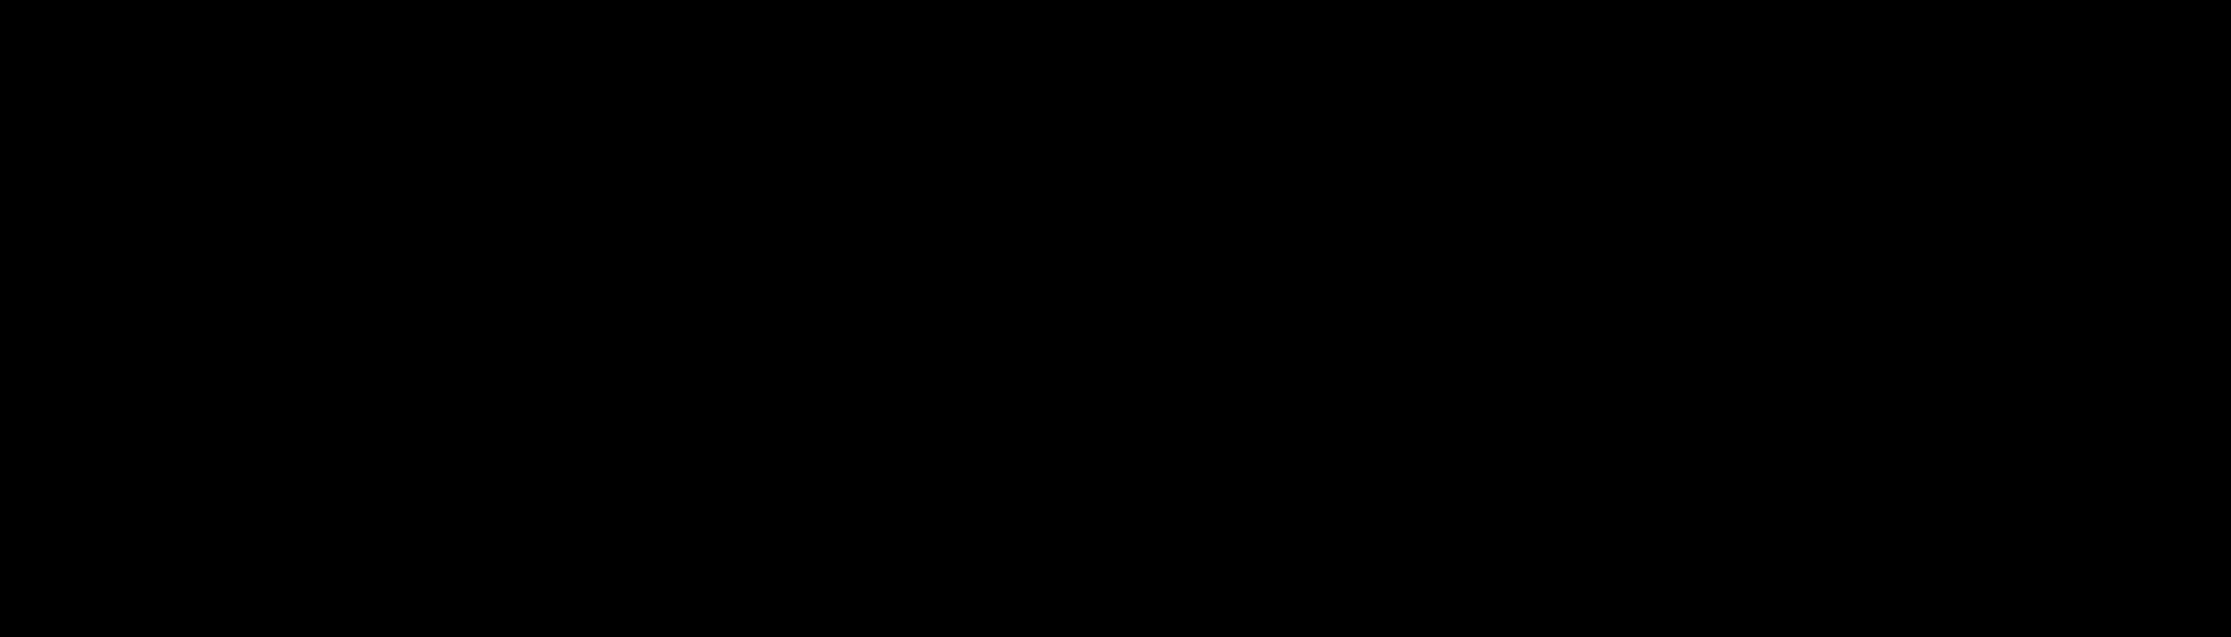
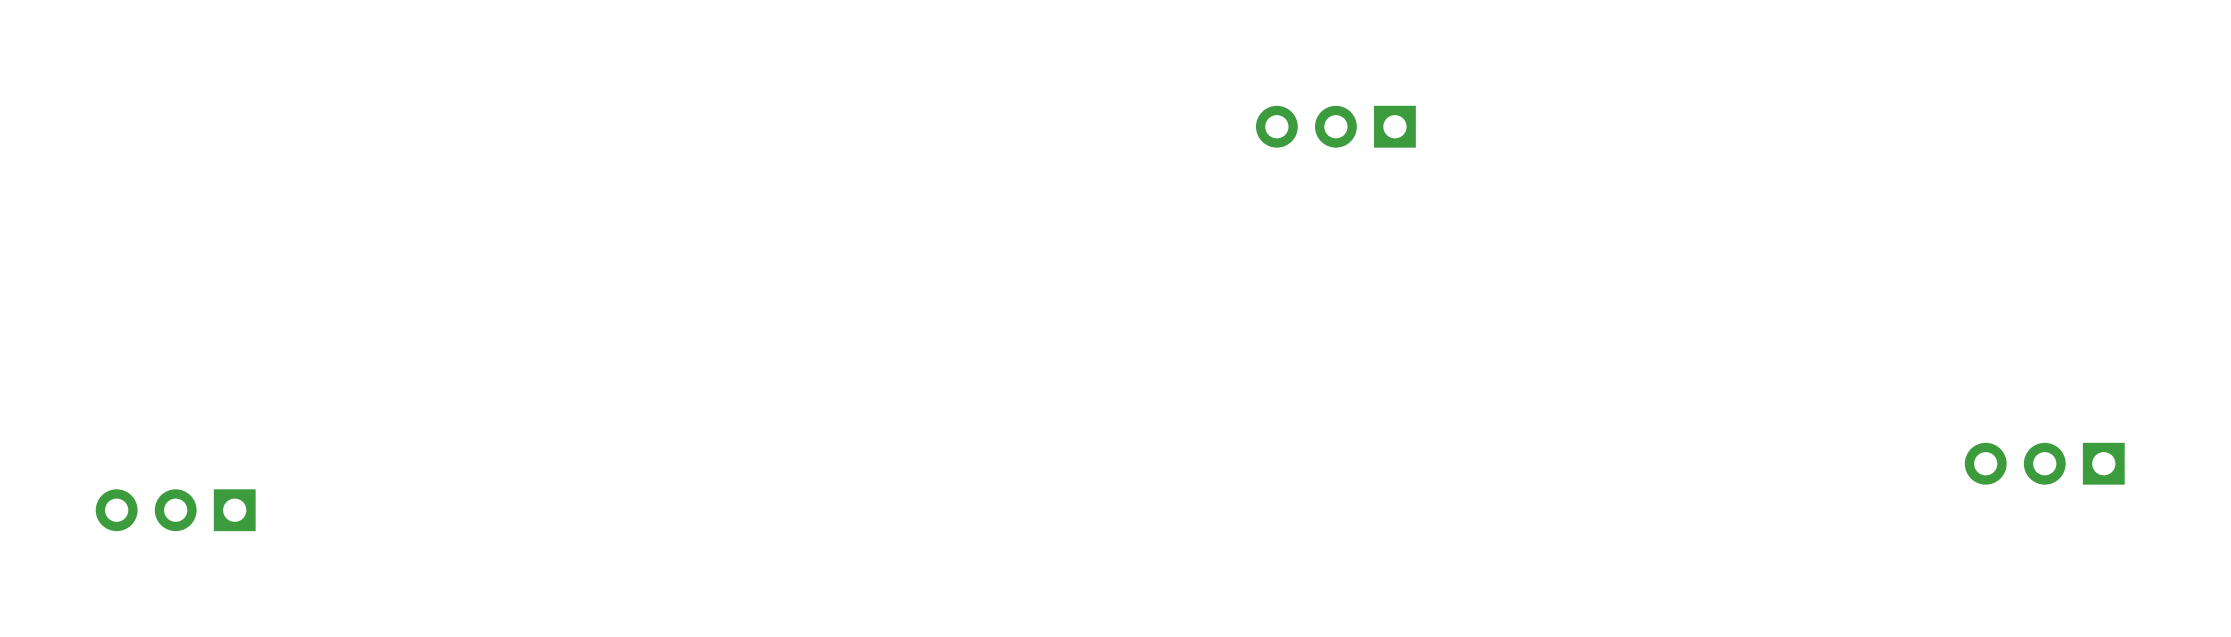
part: none -> (1335, 126)
part: none -> (2044, 463)
part: none -> (175, 510)

